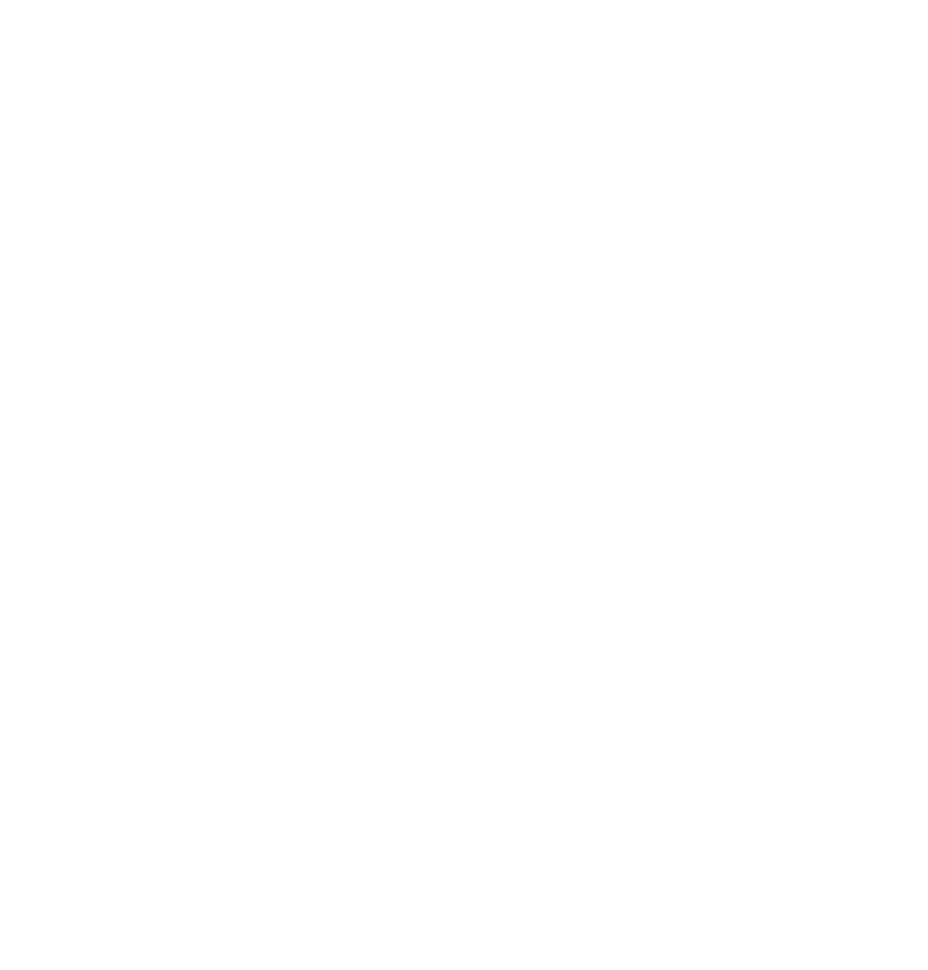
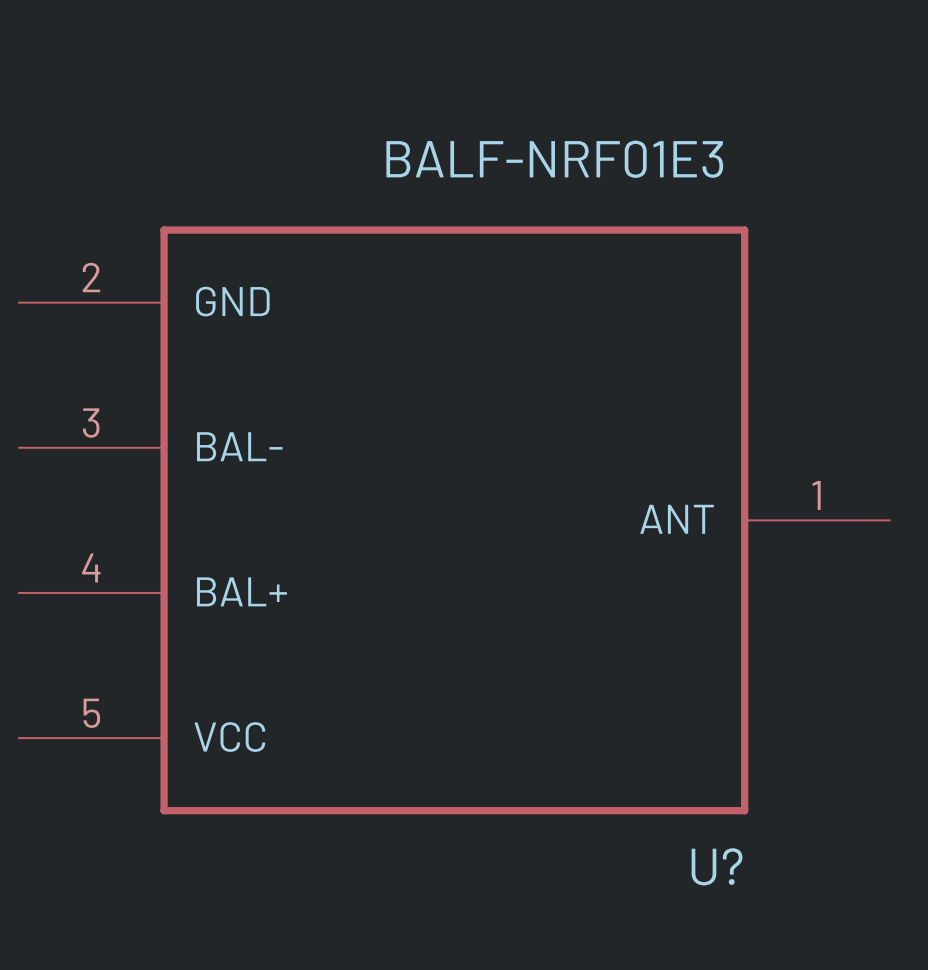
U?: none -> BALF-NRF01E3 (454, 520)

